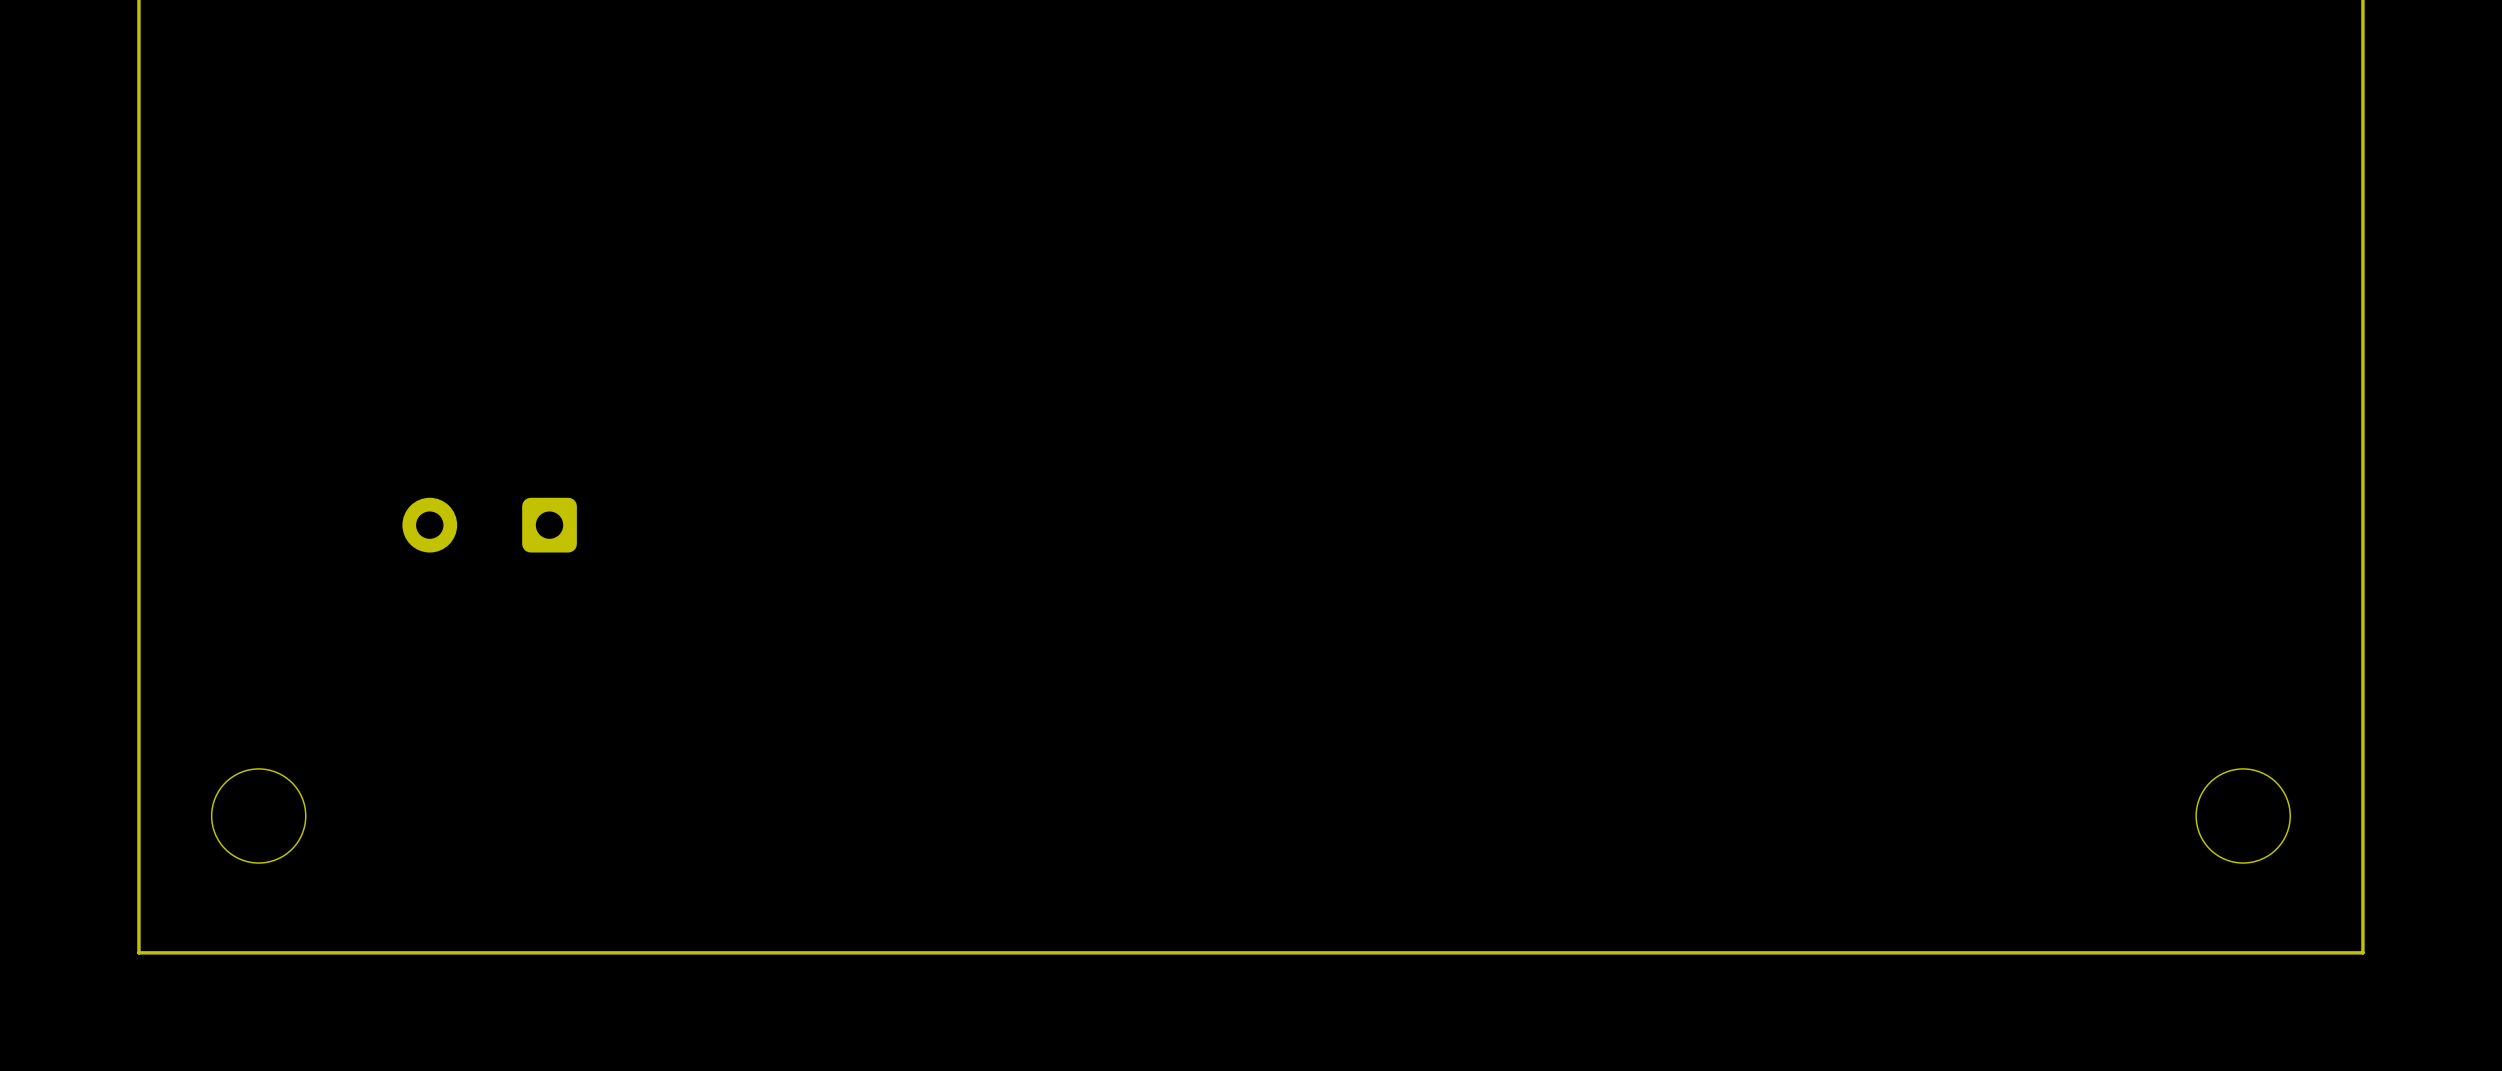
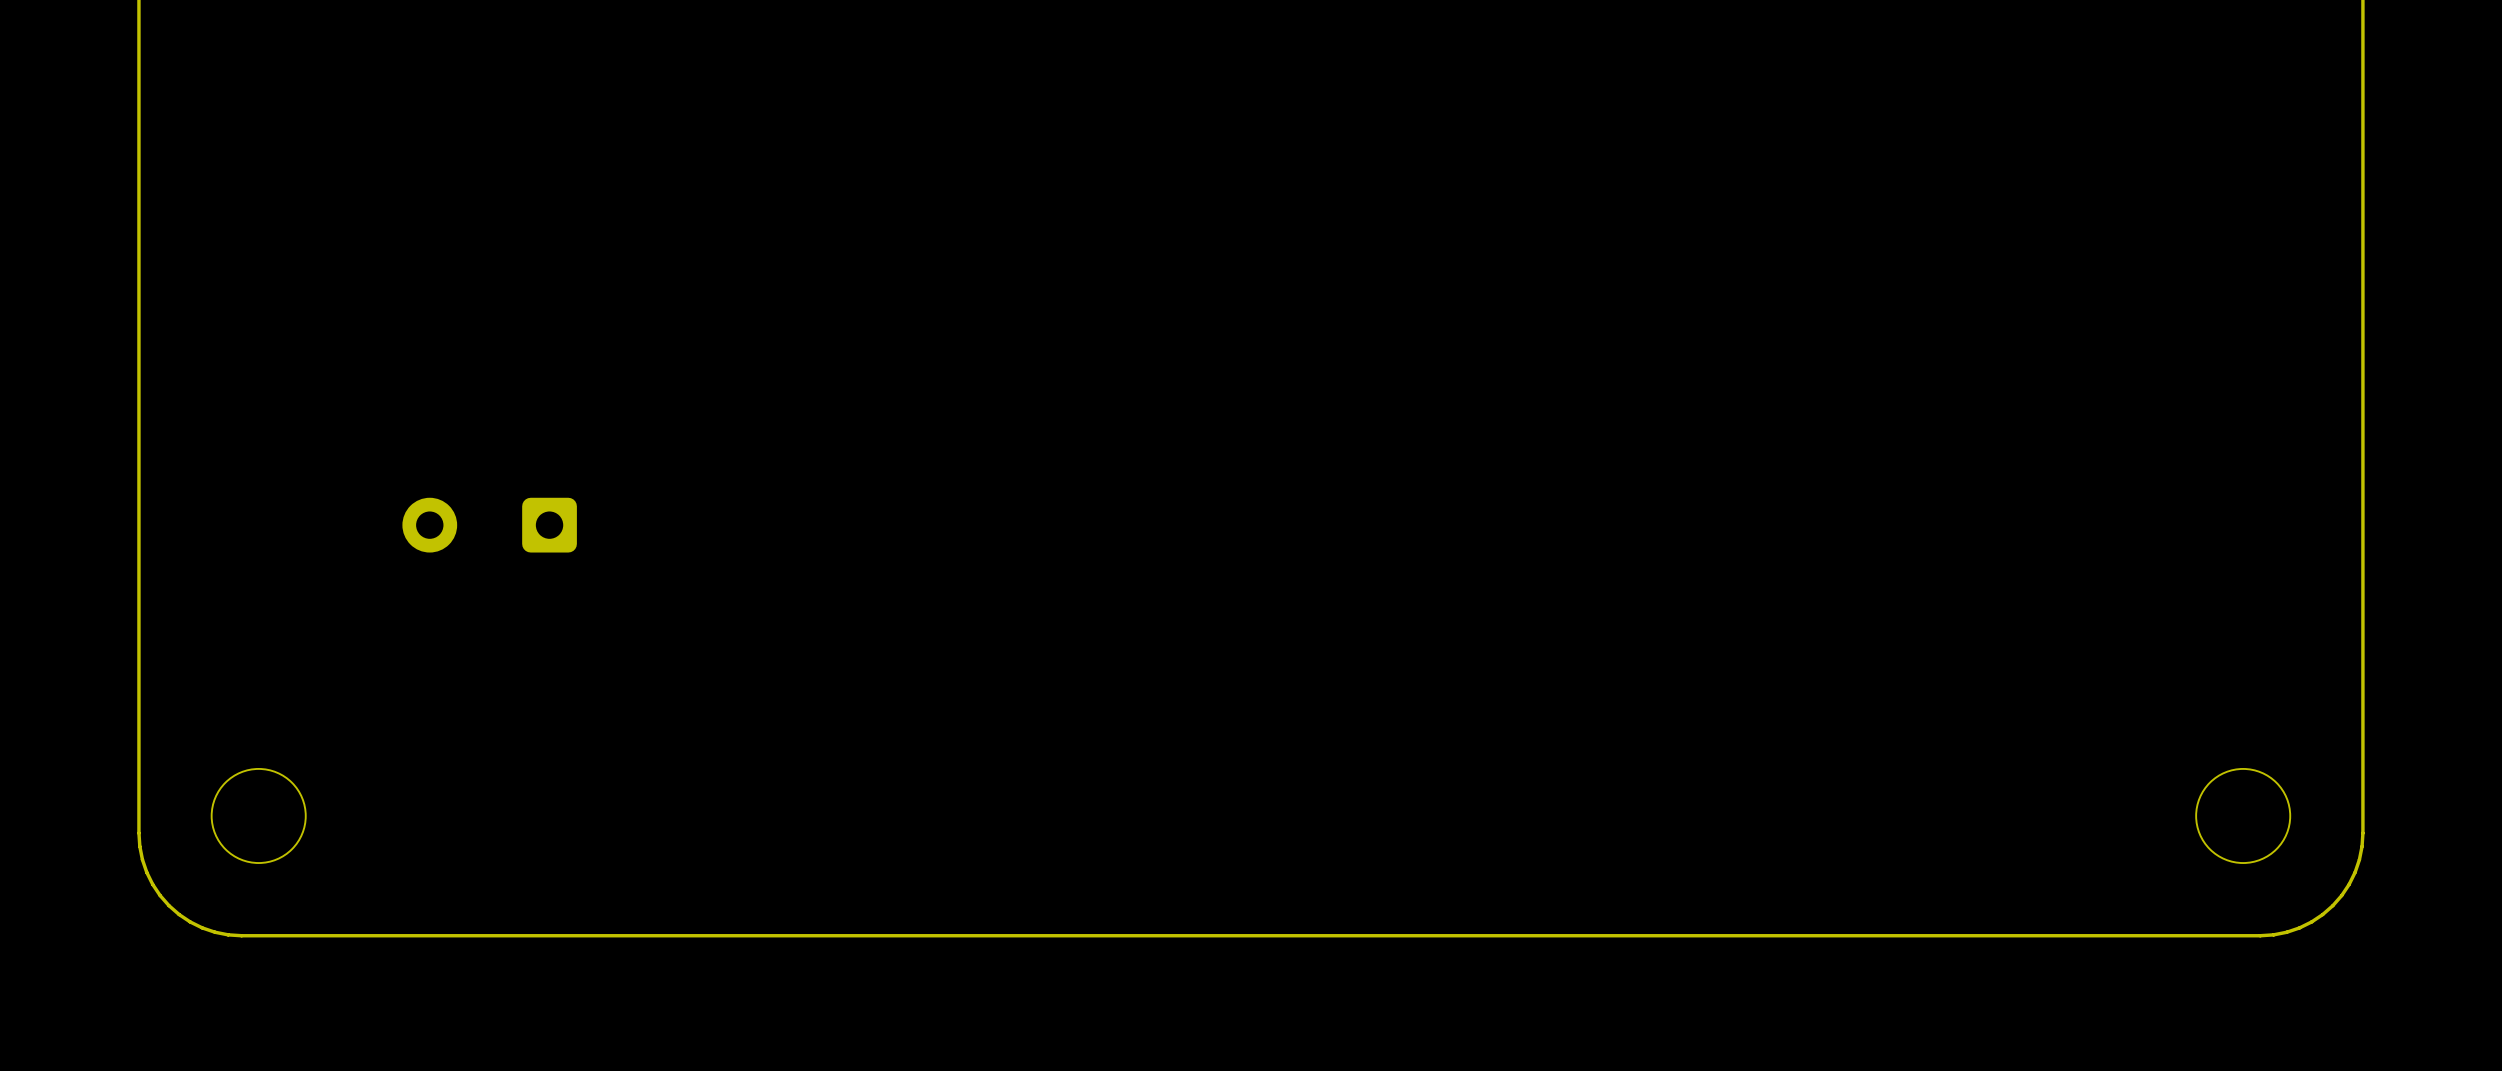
board edge: (2362, 833) (2362, 952) (138, 952) (138, 833) -> (2362, 833) (2359, 859) (2355, 872) (2341, 895) (2332, 905) (2322, 914) (2299, 927) (2286, 932) (2260, 935) (241, 935) (215, 932) (202, 927) (179, 914) (169, 905) (160, 895) (146, 872) (142, 859) (138, 833)

